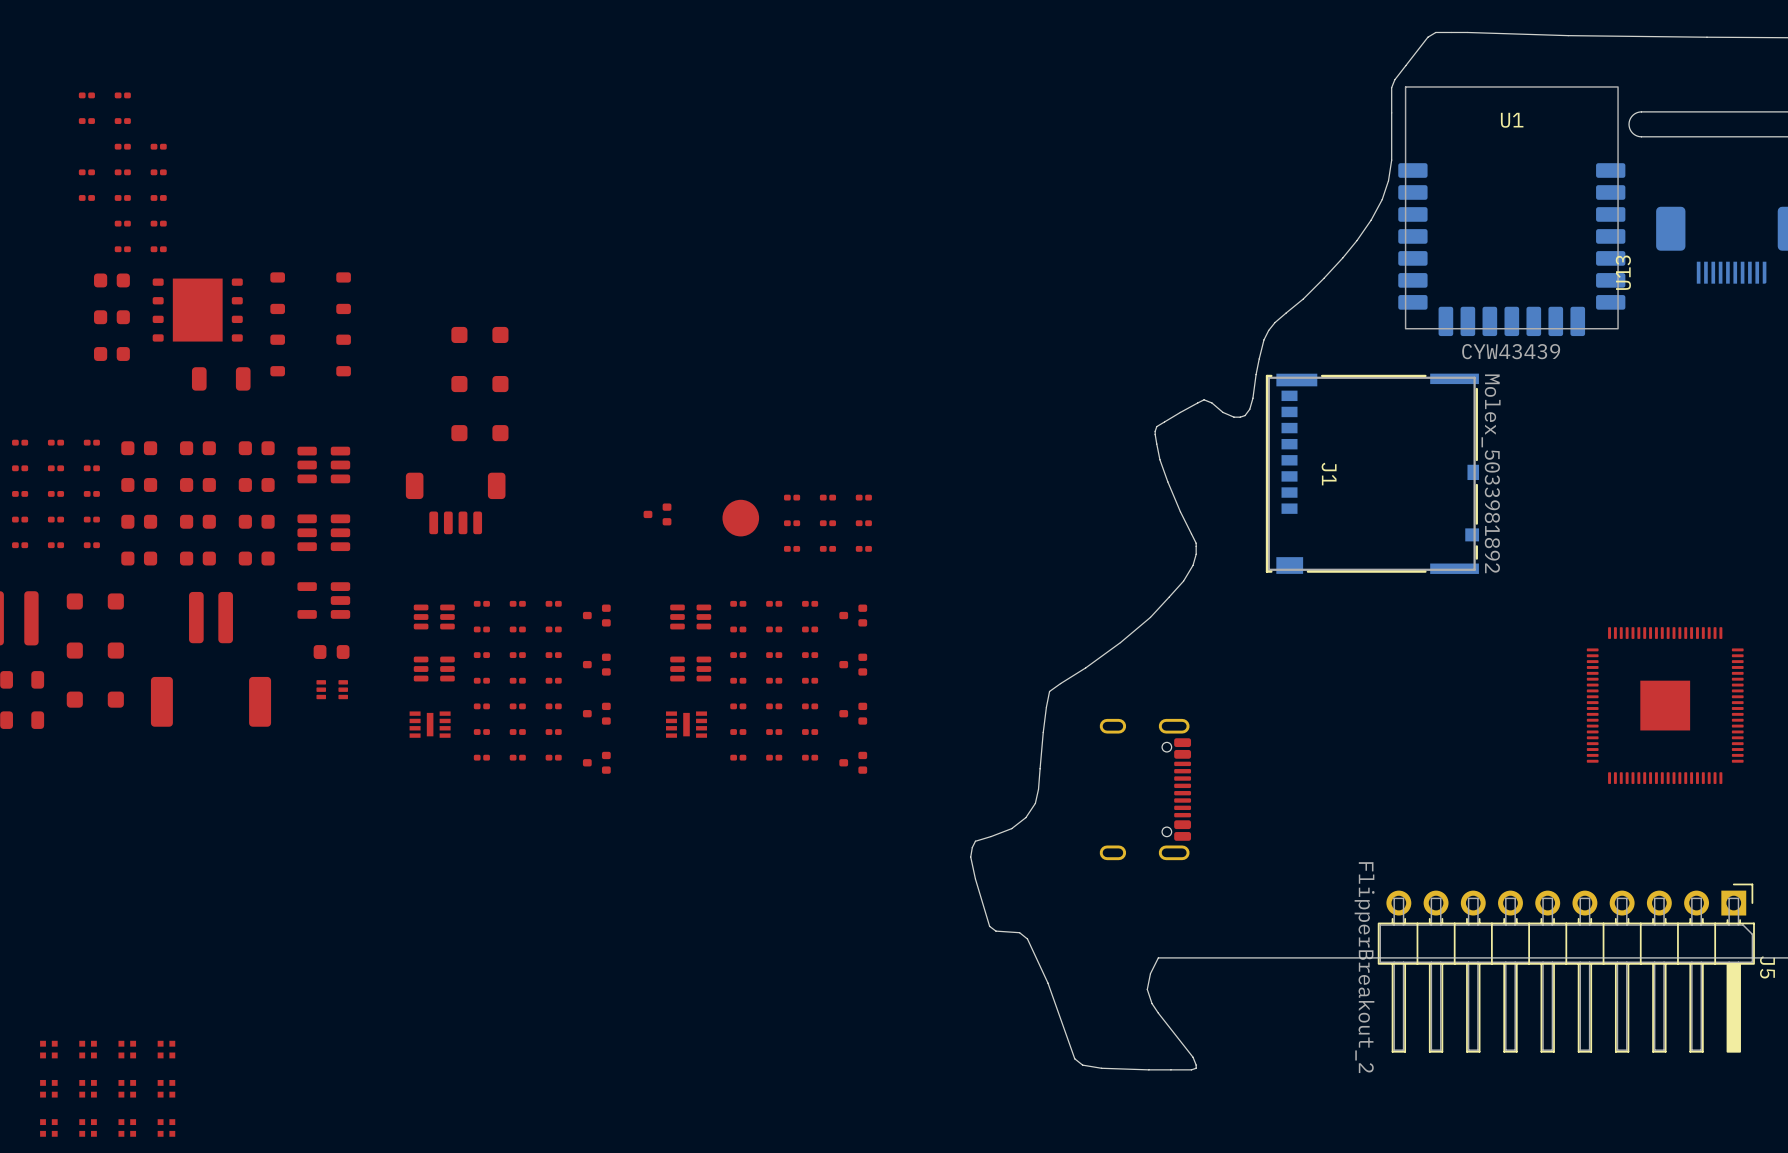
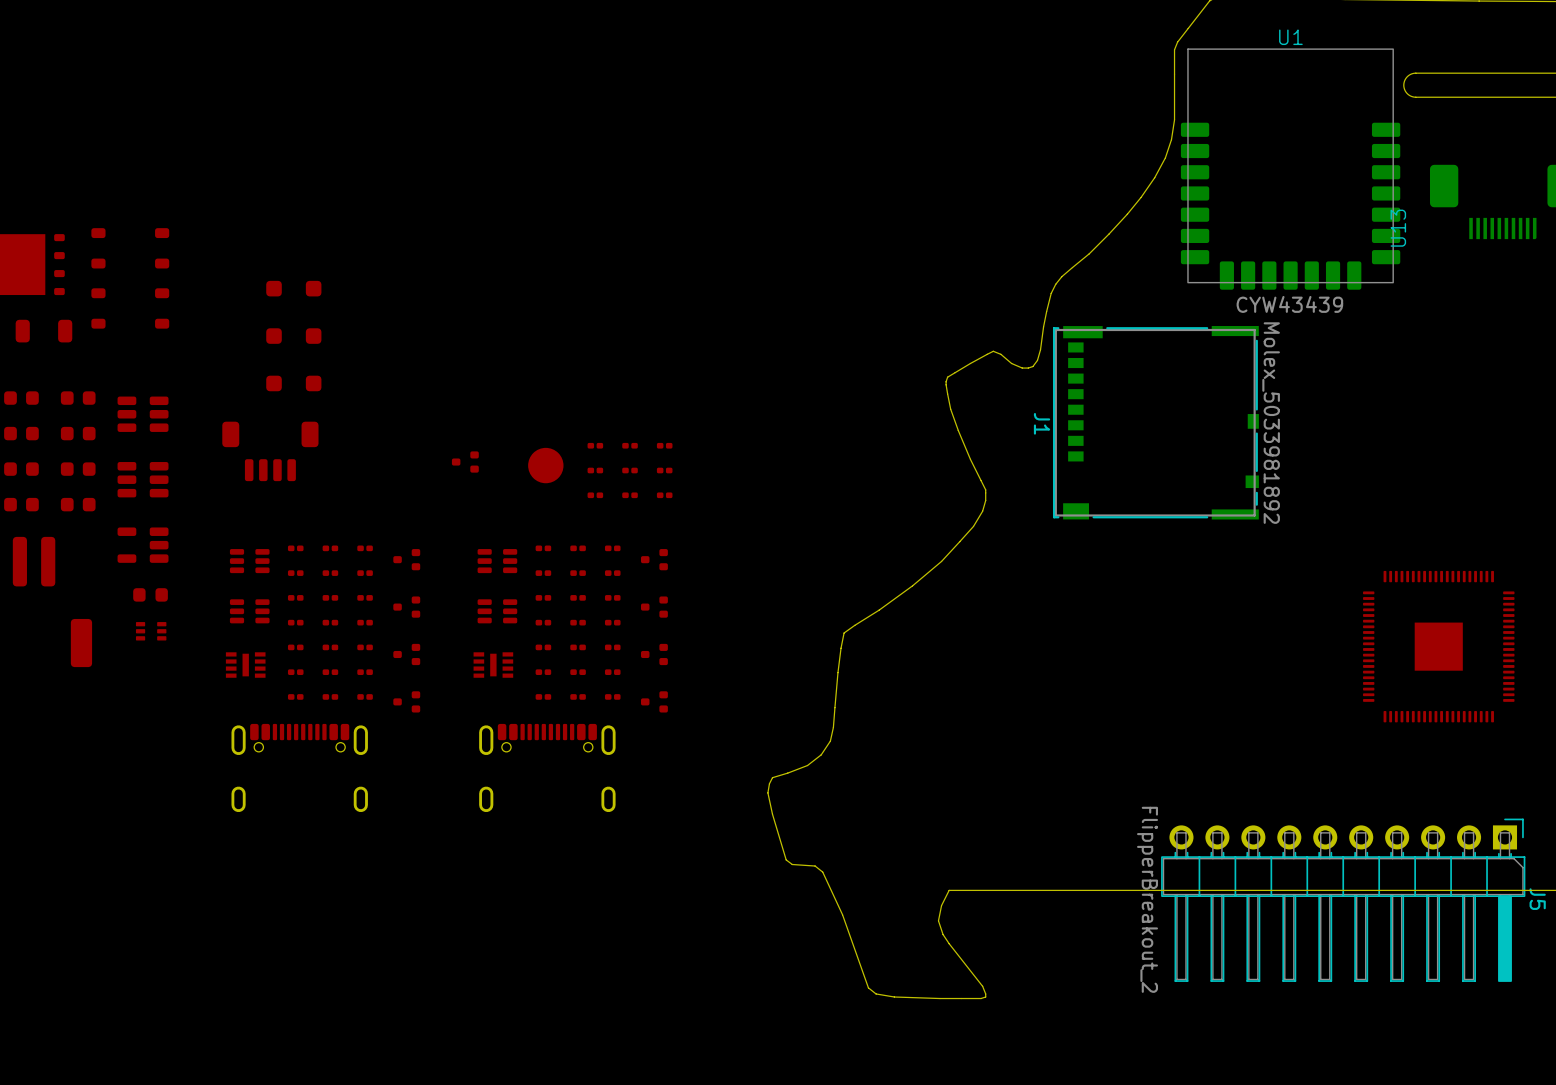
U1 name position: U1 (1512, 120) -> U1 (1290, 37)
J1 name position: J1 (1329, 474) -> J1 (1042, 423)
part: (1145, 789) -> none
part: none -> (299, 767)
part: none -> (547, 767)

